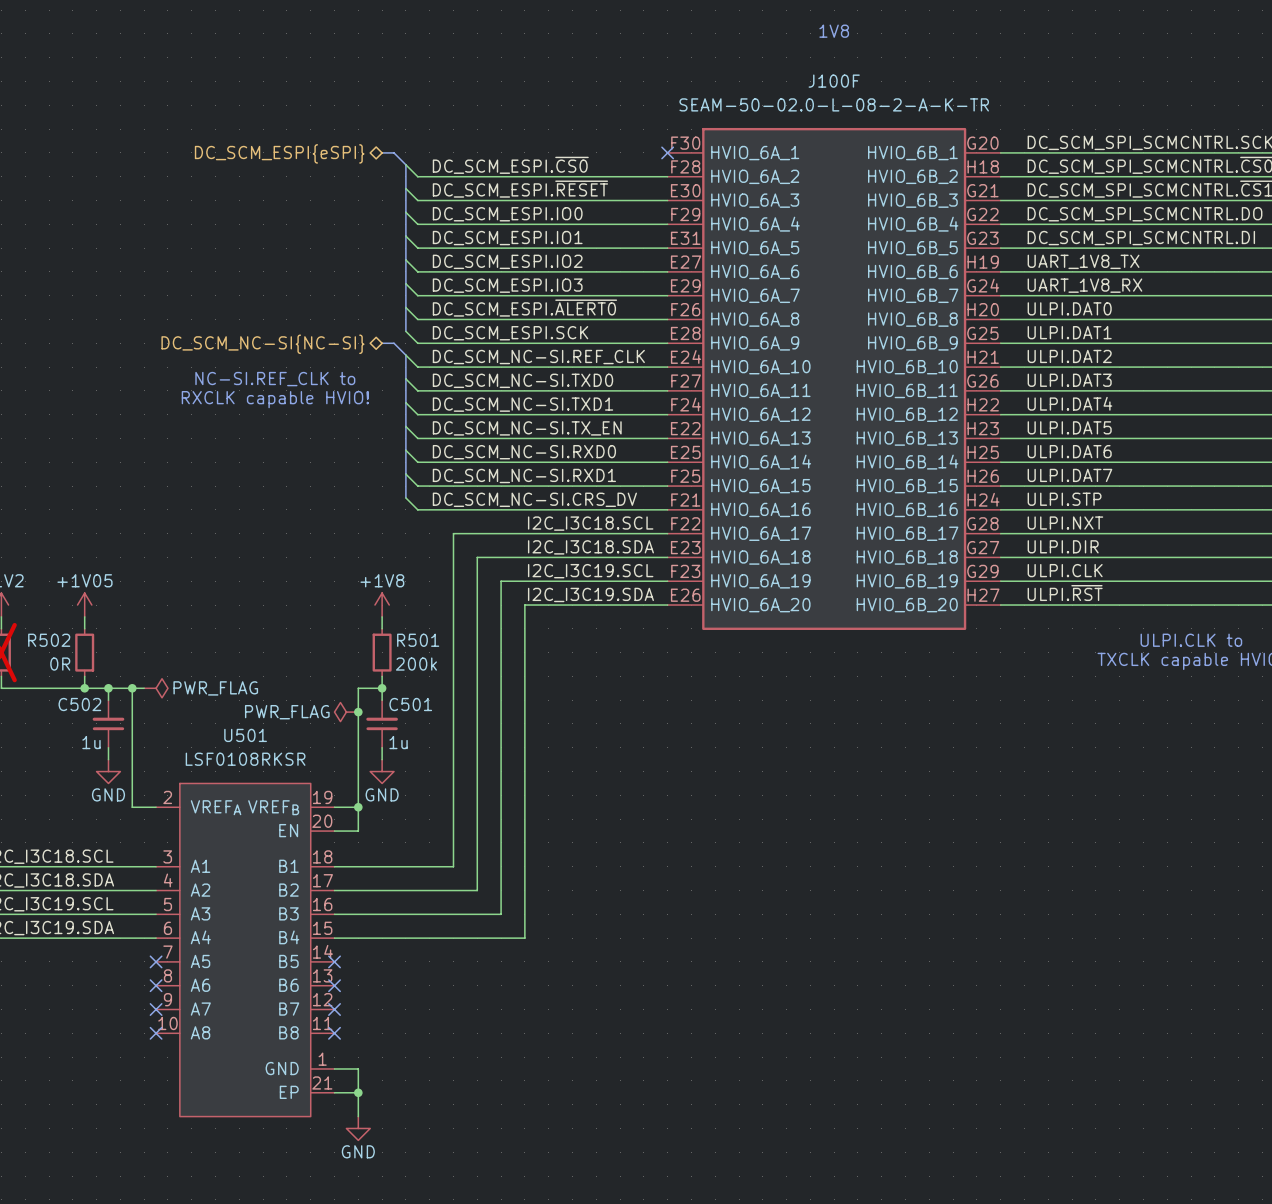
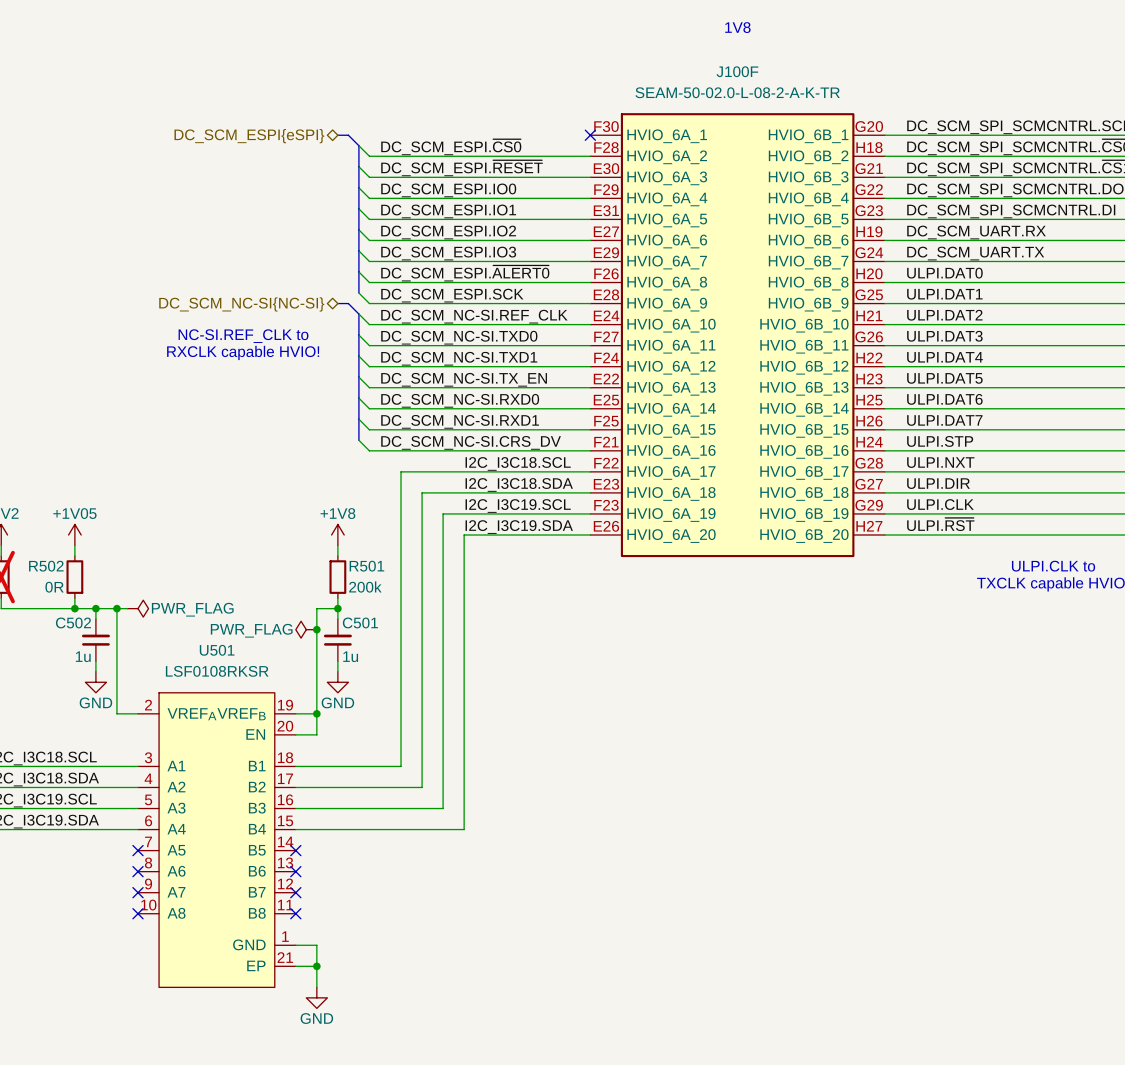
label: UART_1V8_TX (1083, 261) -> DC_SCM_UART.RX (976, 232)
label: UART_1V8_RX (1084, 285) -> DC_SCM_UART.TX (975, 253)

